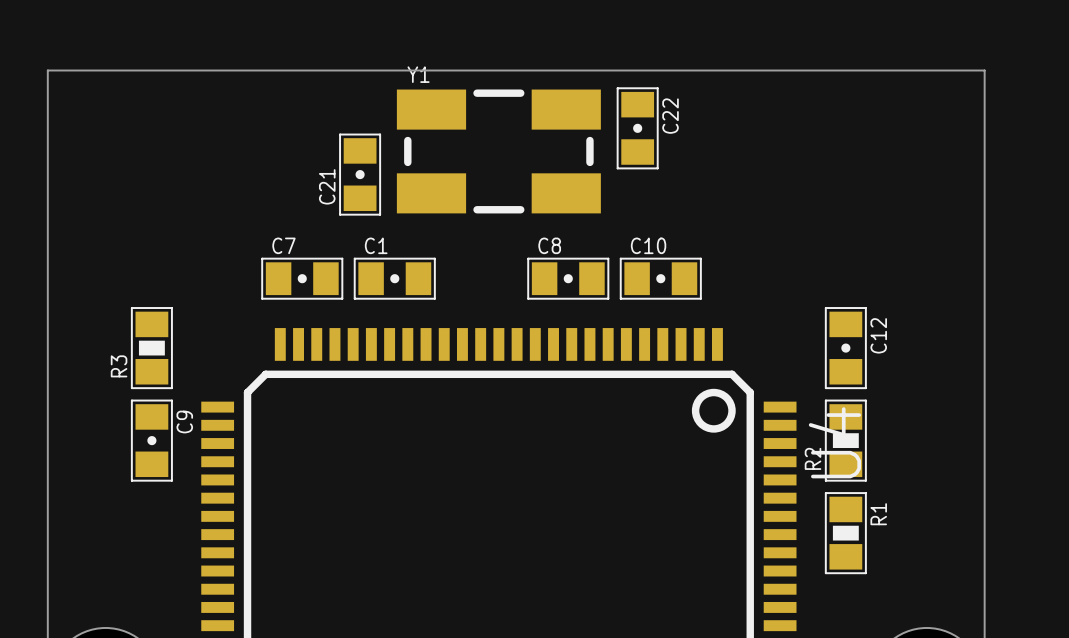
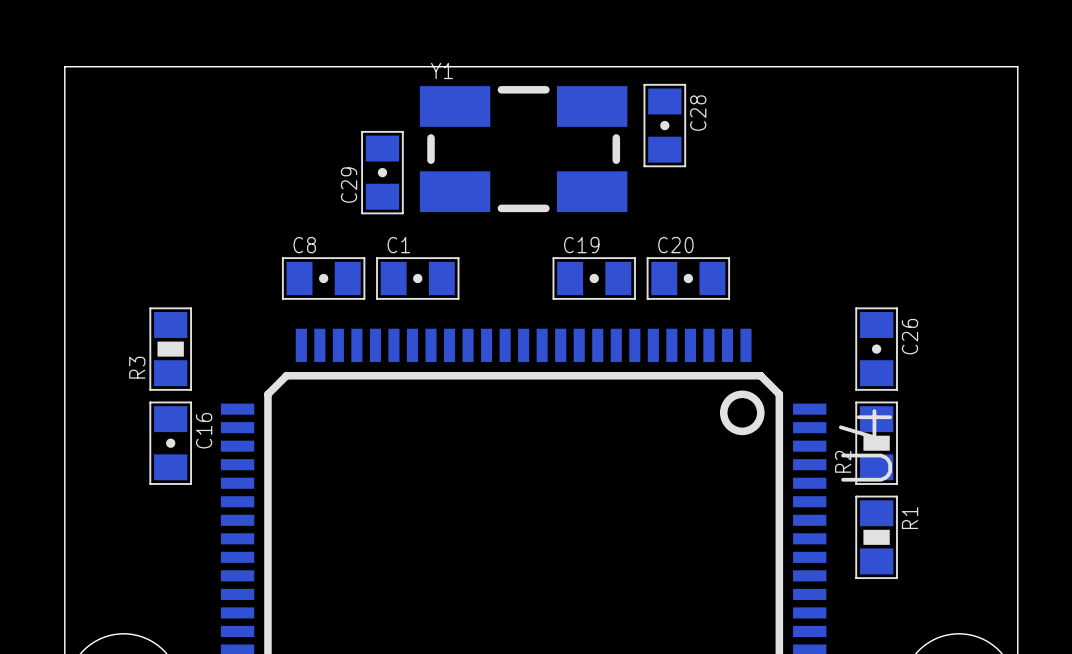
C22 name: C22 (670, 116) -> C28 (698, 113)
C21 name: C21 (327, 186) -> C29 (349, 185)
C7 name: C7 (283, 245) -> C8 (304, 245)
C8 name: C8 (549, 245) -> C19 (581, 245)
C10 name: C10 (648, 245) -> C20 (675, 245)
C12 name: C12 (878, 335) -> C26 (910, 336)
C9 name: C9 (184, 422) -> C16 (204, 430)

